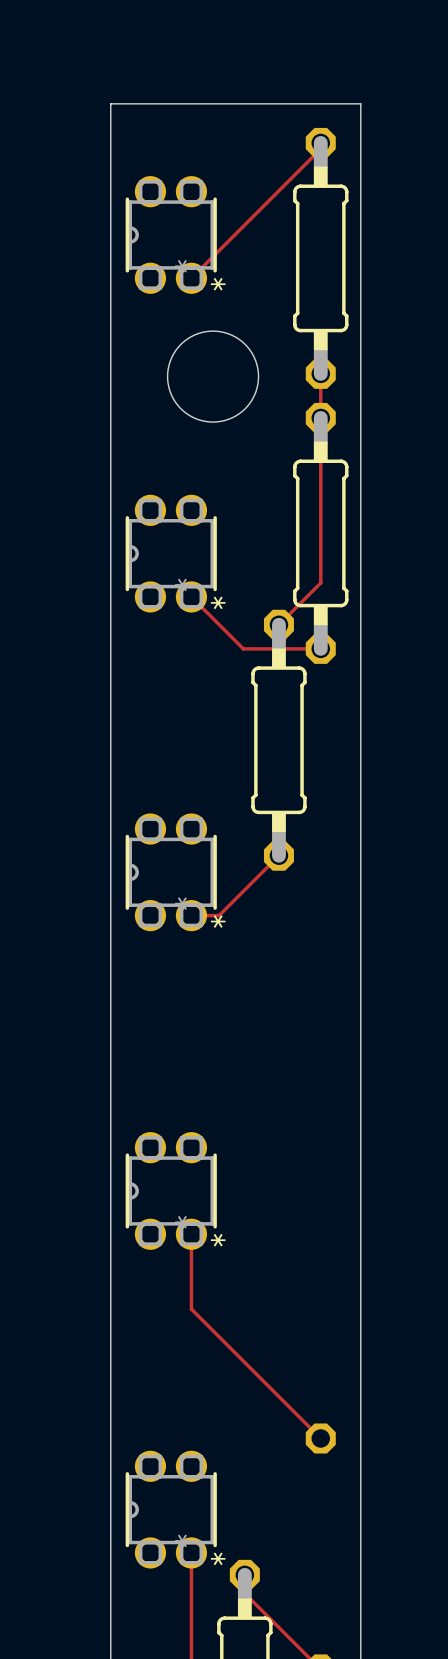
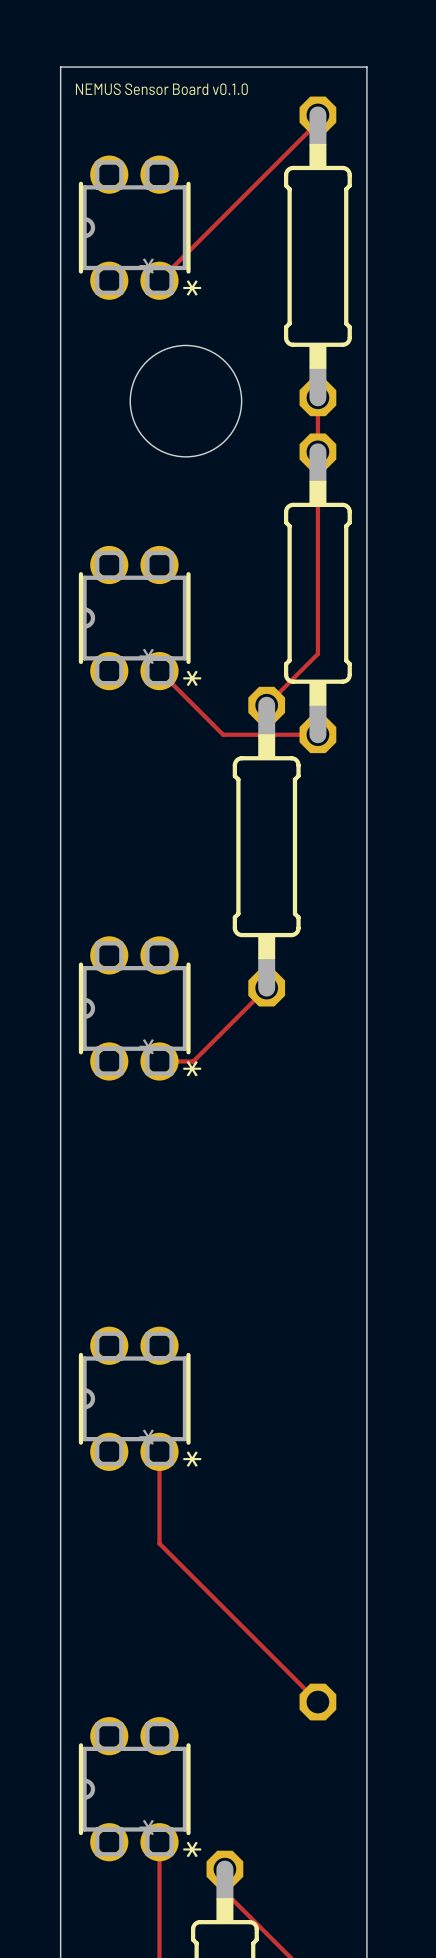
text: none -> NEMUS Sensor Board v0.1.0 (161, 89)

